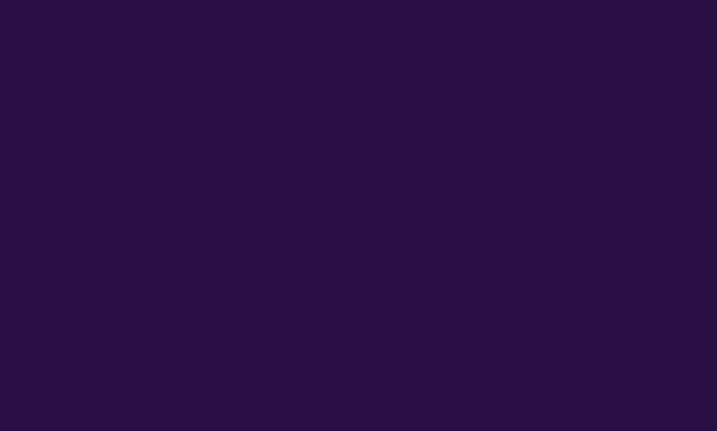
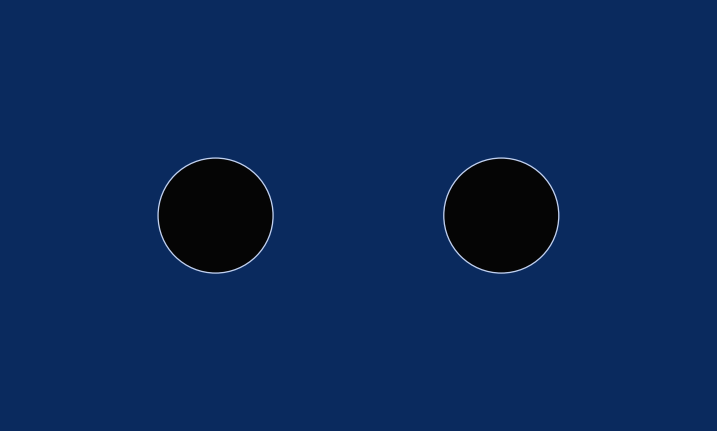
part: none -> (215, 215)
part: none -> (501, 215)

